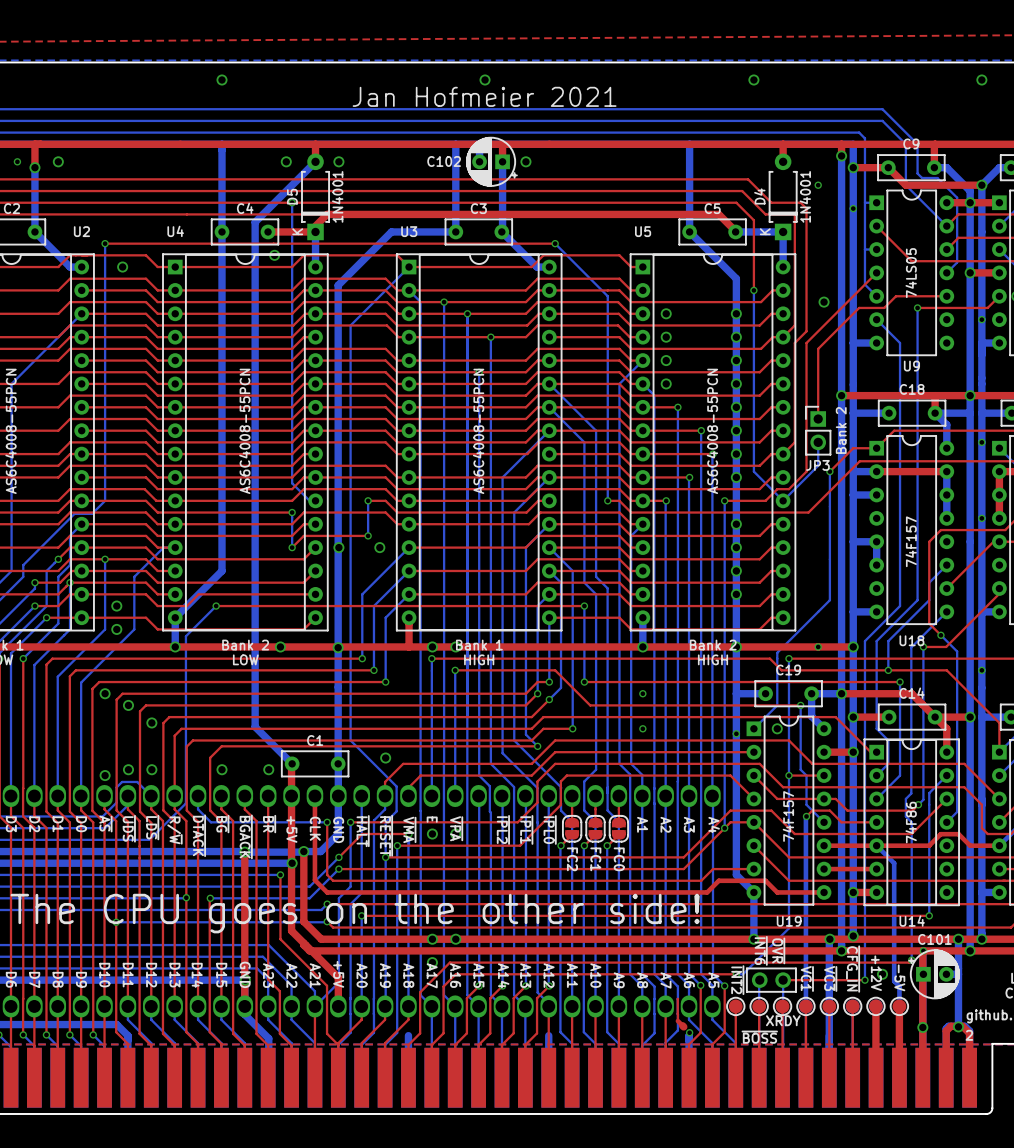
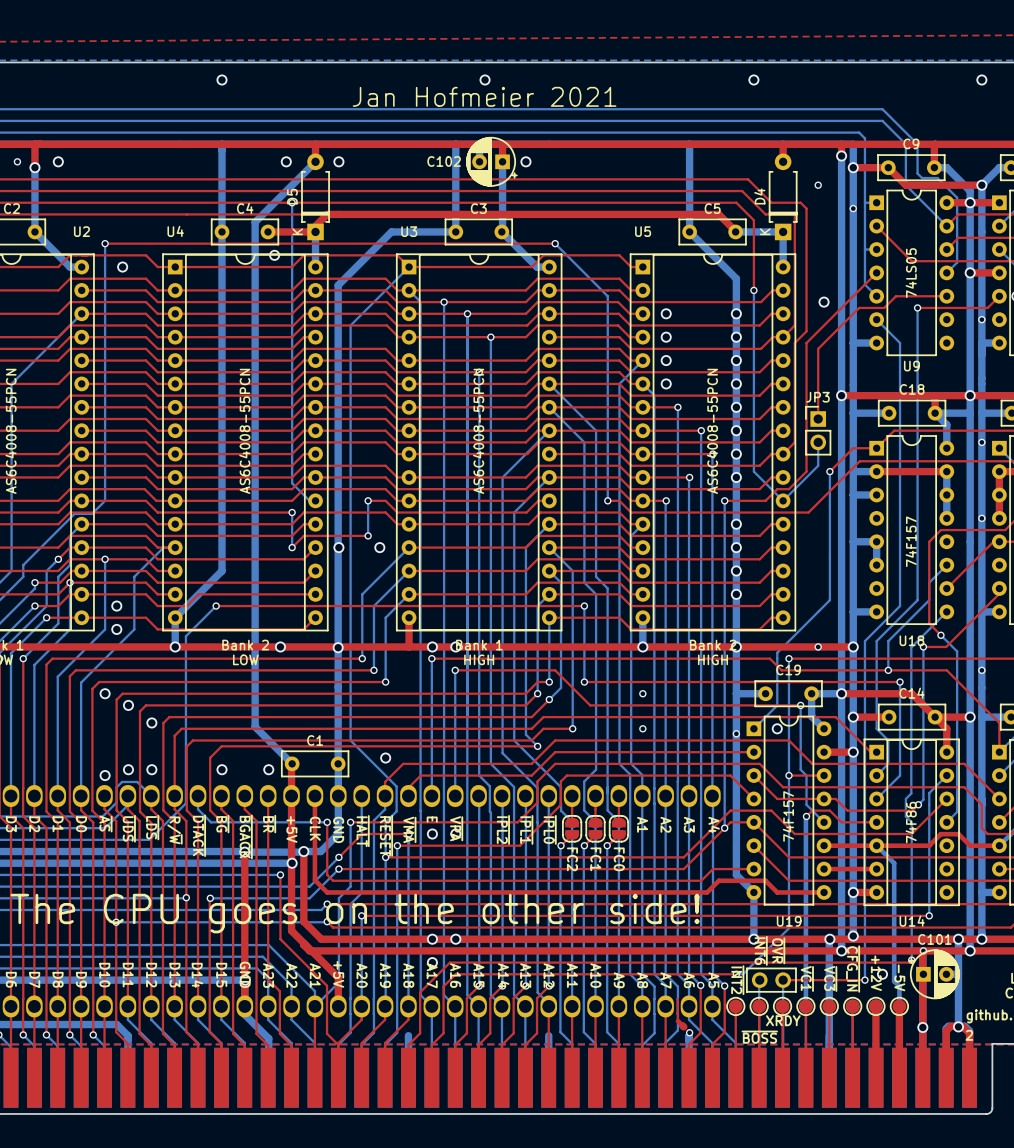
D5 value: 1N4001 (337, 196) -> none
D4 value: 1N4001 (805, 196) -> none
JP3 value: Bank 2 (841, 430) -> none
JP3 name position: JP3 (817, 465) -> JP3 (817, 397)

